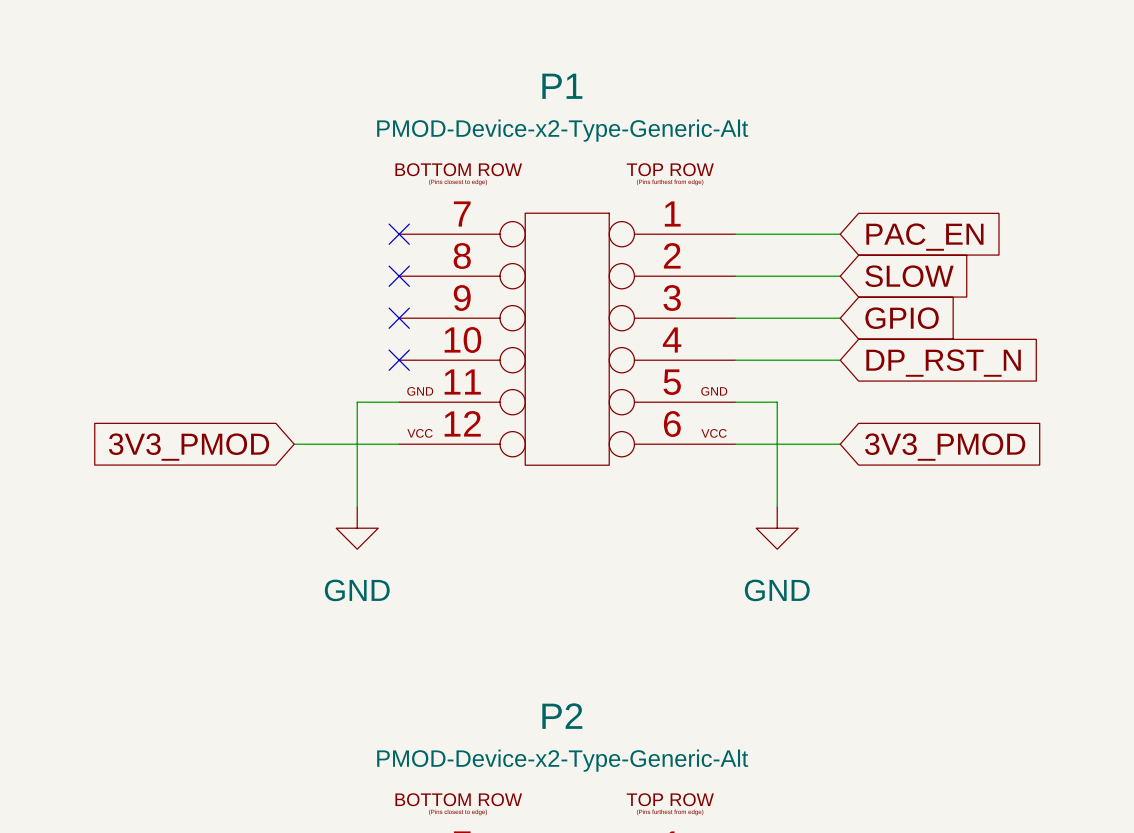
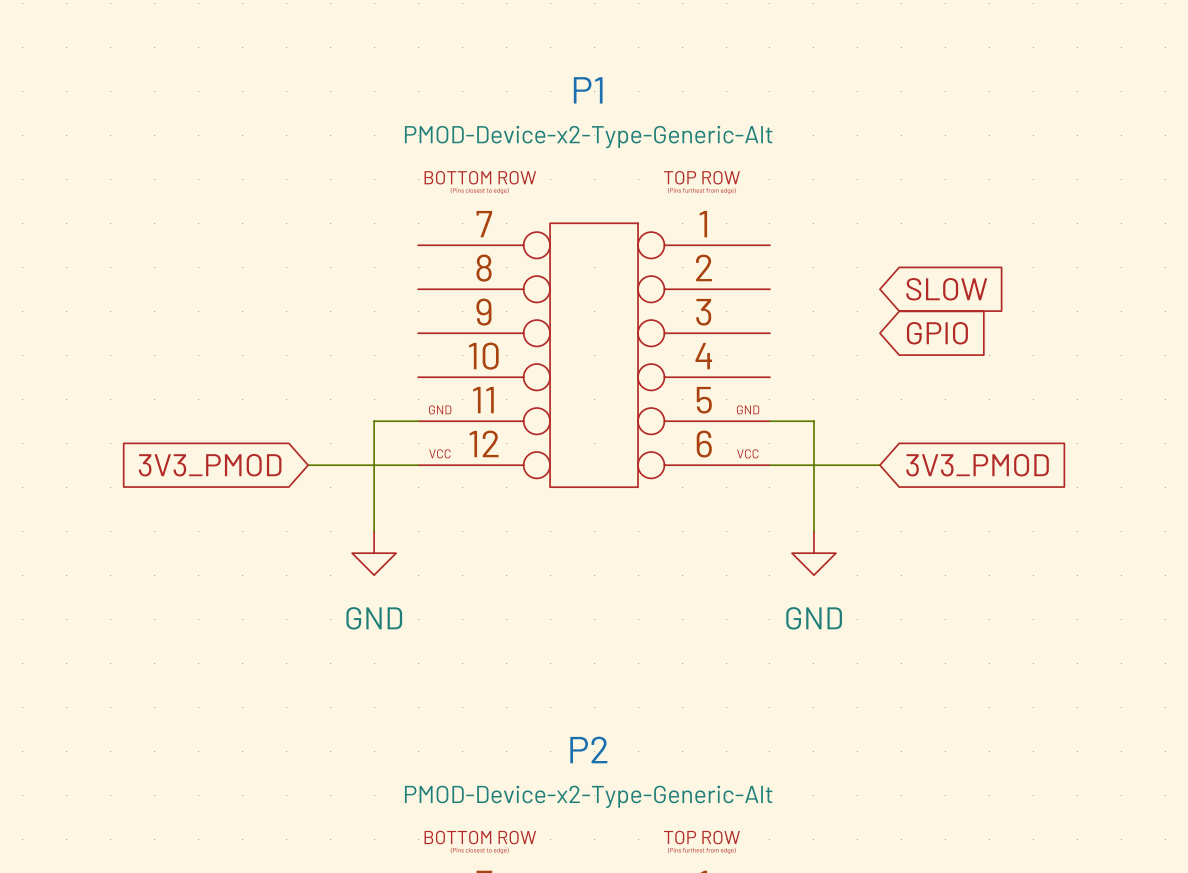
no-connect mark: (399, 234) -> none
wire: (735, 234) (840, 234) -> none
global label: PAC_EN (924, 237) -> none
no-connect mark: (399, 276) -> none
wire: (735, 276) (840, 276) -> none
no-connect mark: (399, 318) -> none
wire: (735, 318) (840, 318) -> none
no-connect mark: (399, 360) -> none
wire: (735, 360) (840, 360) -> none
global label: DP_RST_N (943, 363) -> none

